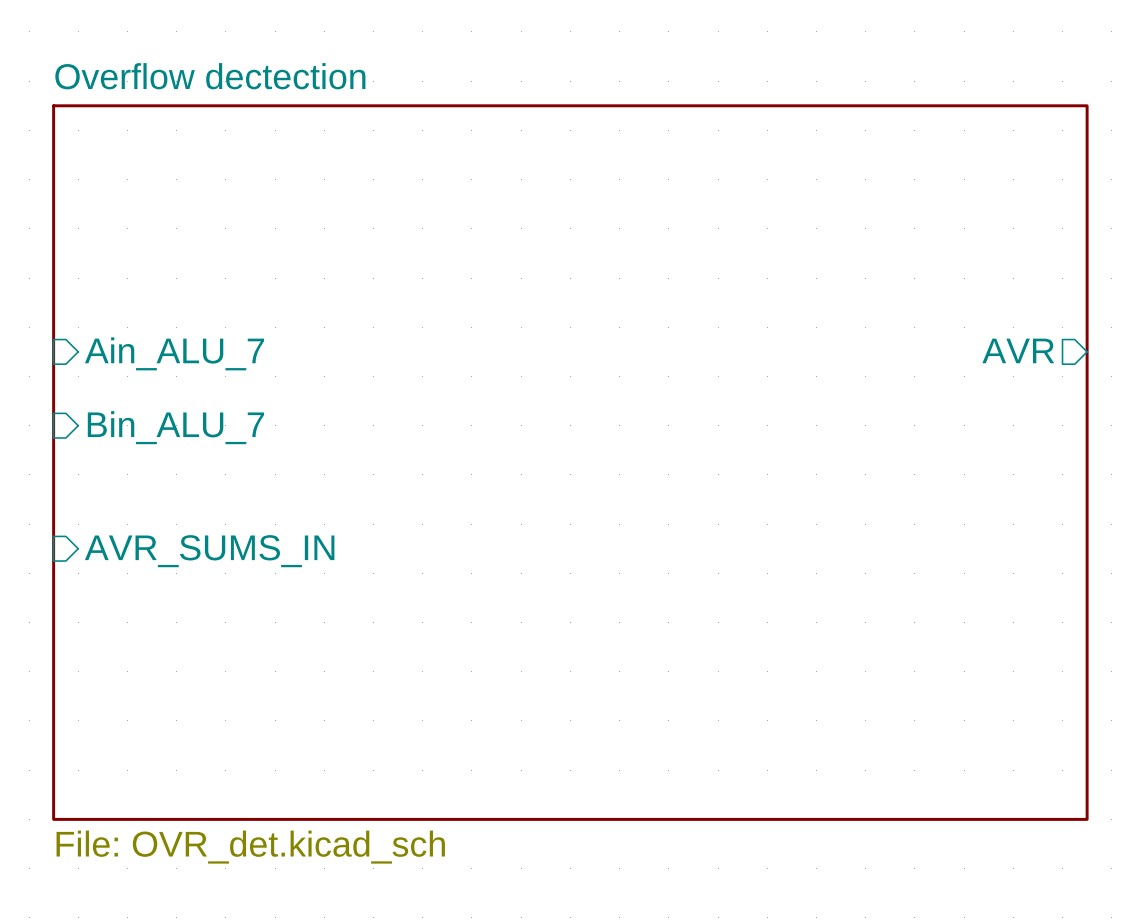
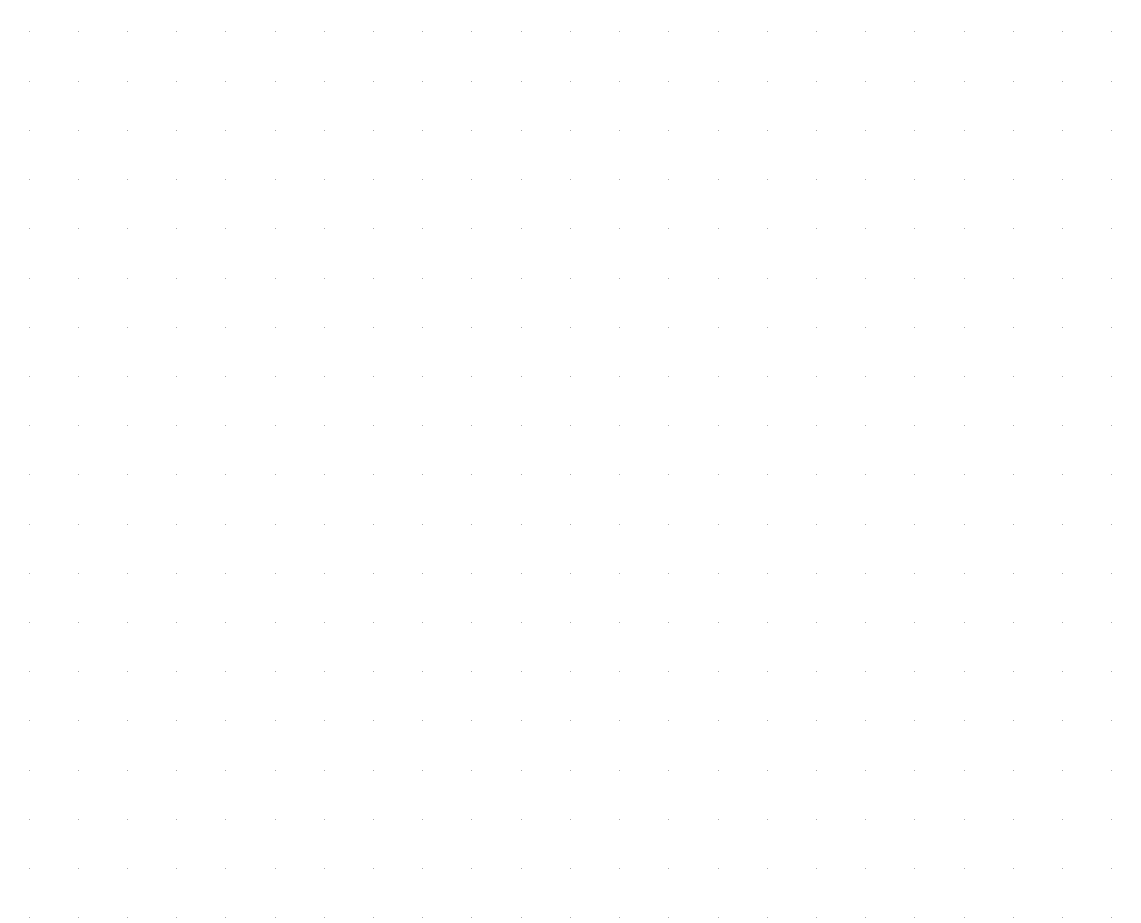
sheet pin: AVR (1018, 350) -> none
sheet pin: Ain_ALU_7 (174, 353) -> none
sheet pin: Bin_ALU_7 (175, 427) -> none
sheet Overflow dectection: File: OVR_det.kicad_sch (570, 462) -> none
sheet pin: AVR_SUMS_IN (209, 551) -> none

